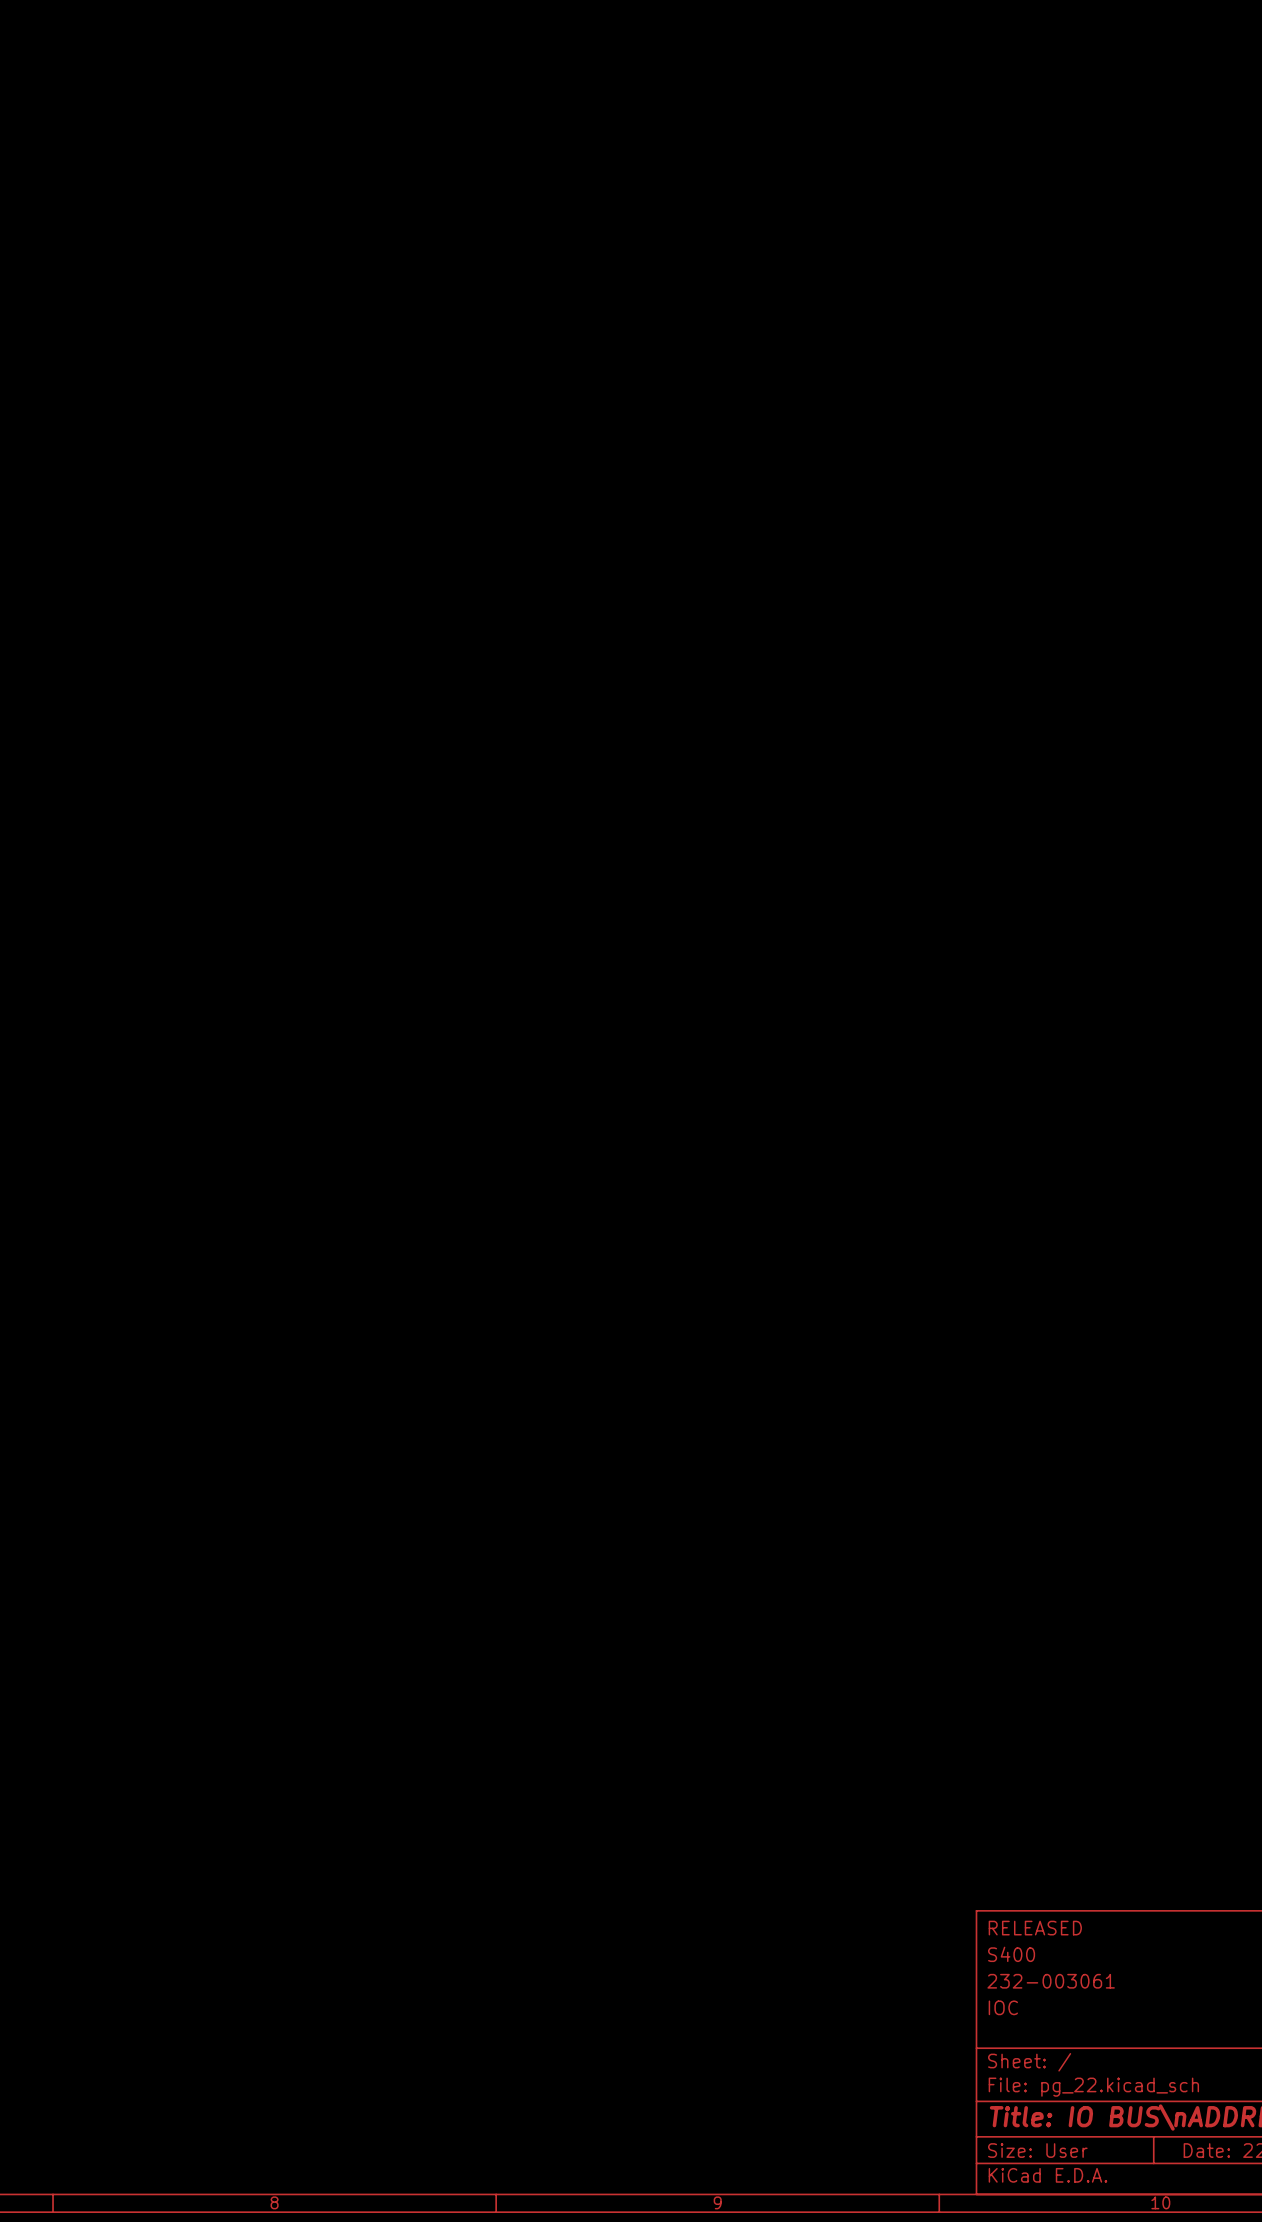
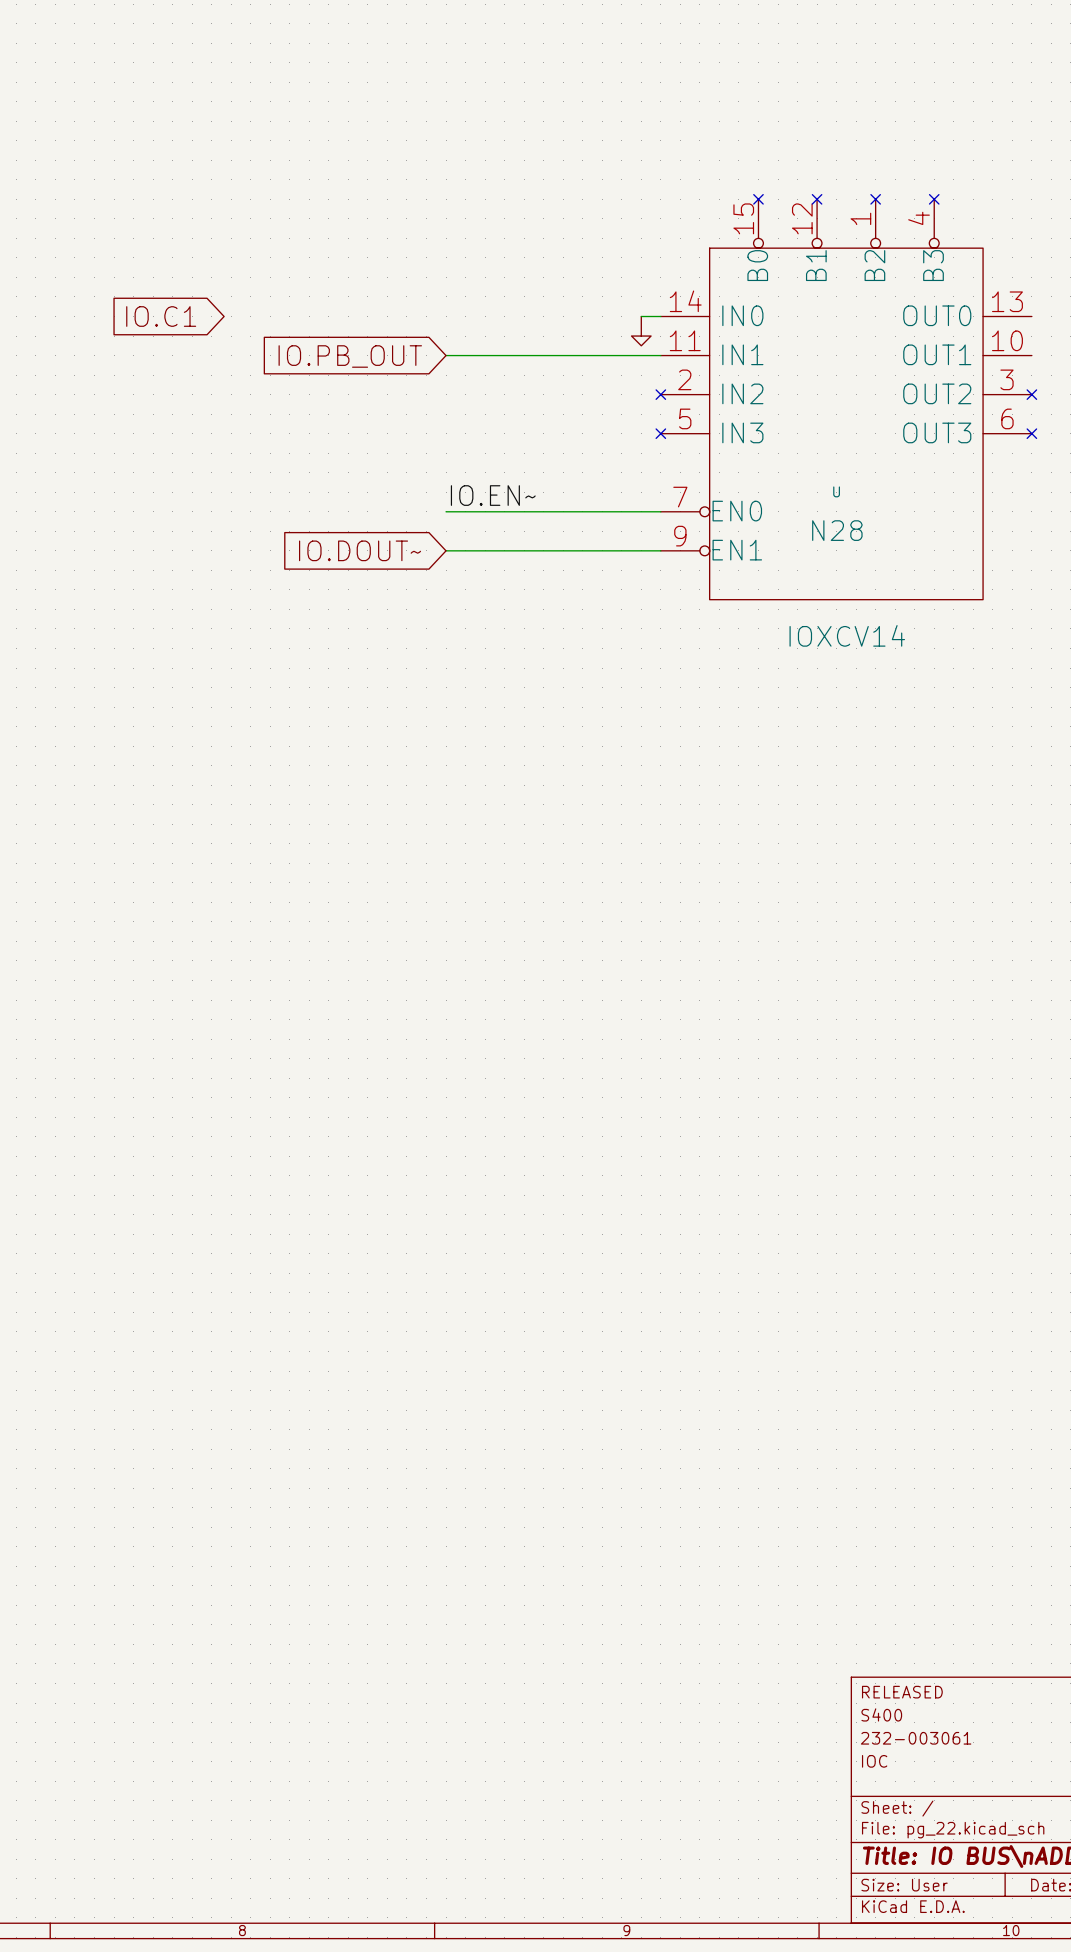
no-connect mark: none -> (758, 199)
no-connect mark: none -> (817, 199)
no-connect mark: none -> (875, 199)
no-connect mark: none -> (934, 199)
global label: none -> IO.C1 (161, 316)
wire: none -> (641, 316) (660, 316)
power symbol: none -> (641, 331)
wire: none -> (446, 355) (660, 355)
global label: none -> IO.PB_OUT (350, 356)
no-connect mark: none -> (660, 394)
no-connect mark: none -> (1031, 394)
U: none -> (846, 399)
no-connect mark: none -> (660, 433)
no-connect mark: none -> (1031, 433)
label: none -> IO.EN~ (493, 495)
wire: none -> (446, 511) (660, 511)
global label: none -> IO.DOUT~ (360, 550)
wire: none -> (446, 550) (660, 550)

